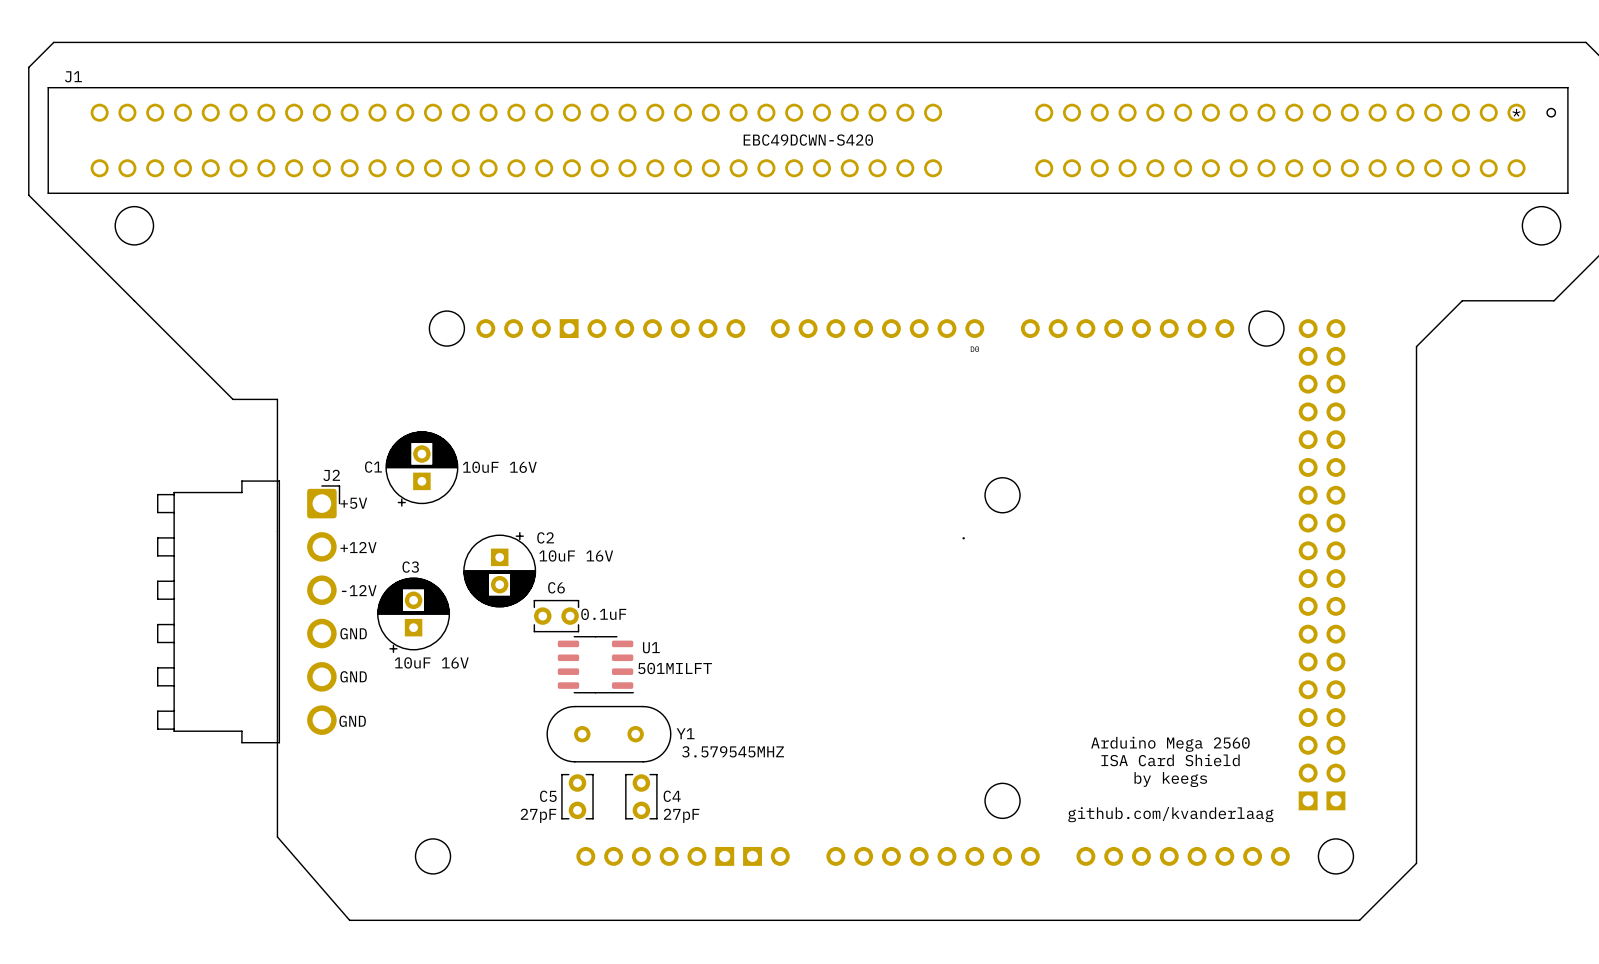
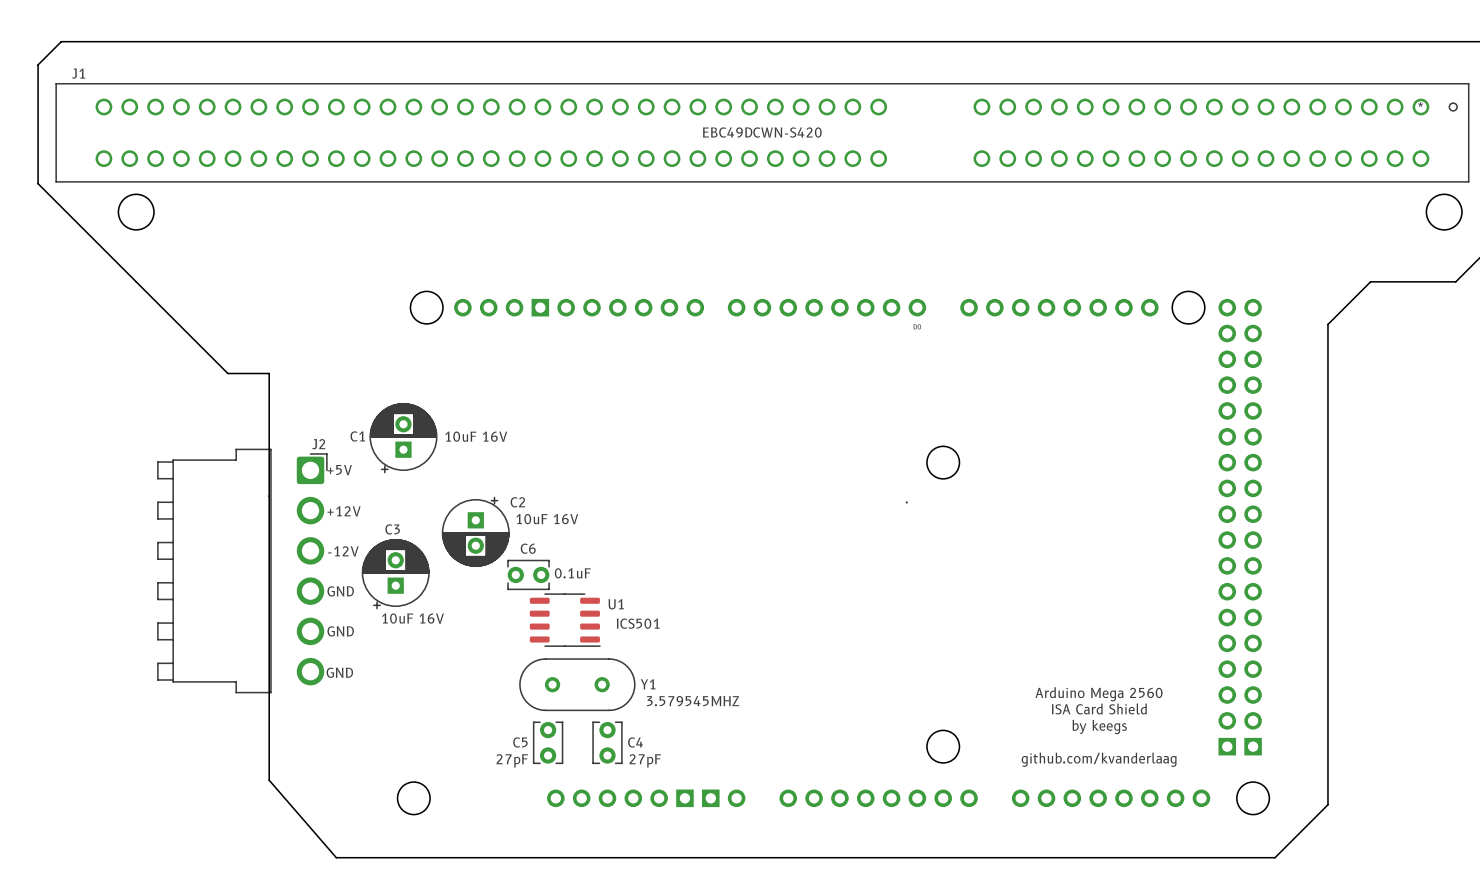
U1 value: 501MILFT (675, 668) -> ICS501 (638, 623)

